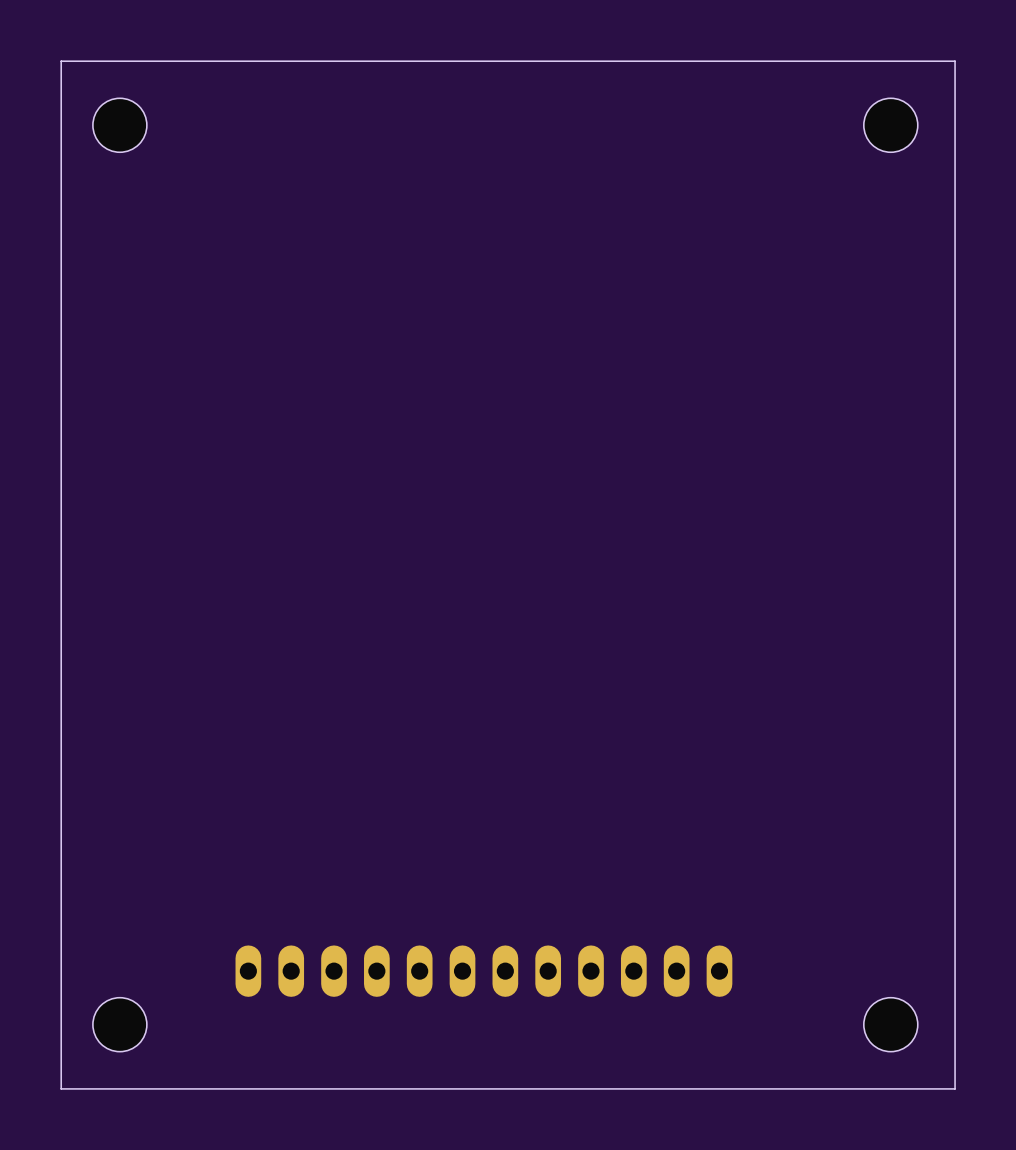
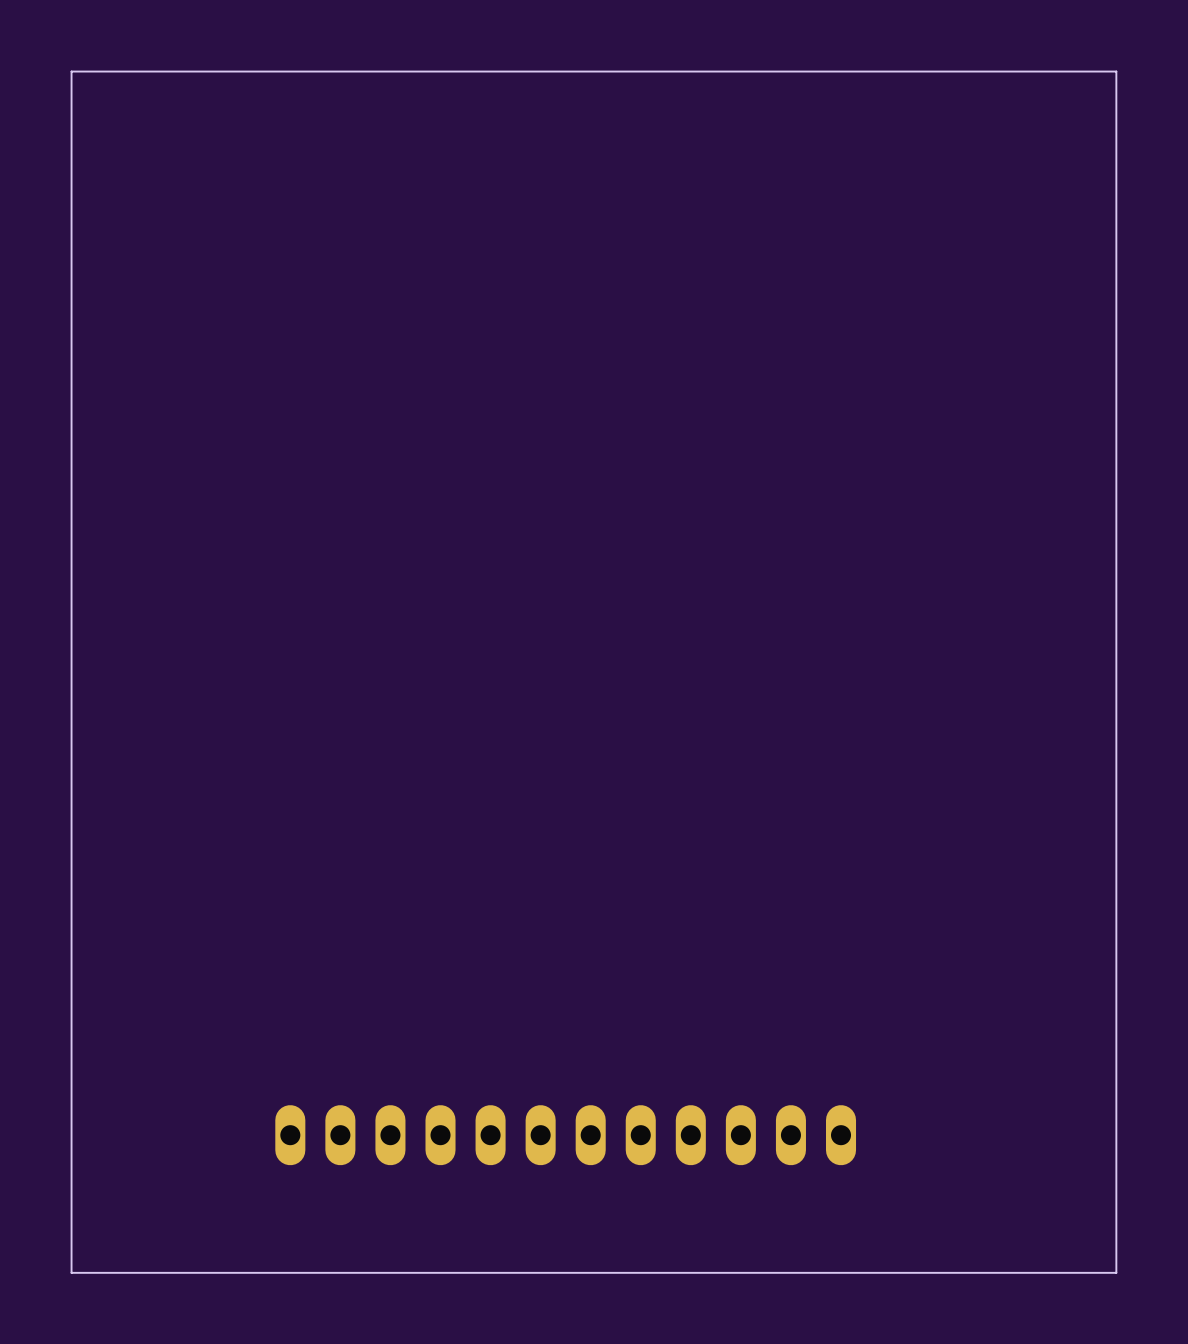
hole: (119, 125) -> none
hole: (890, 125) -> none
hole: (119, 1024) -> none
hole: (890, 1024) -> none

